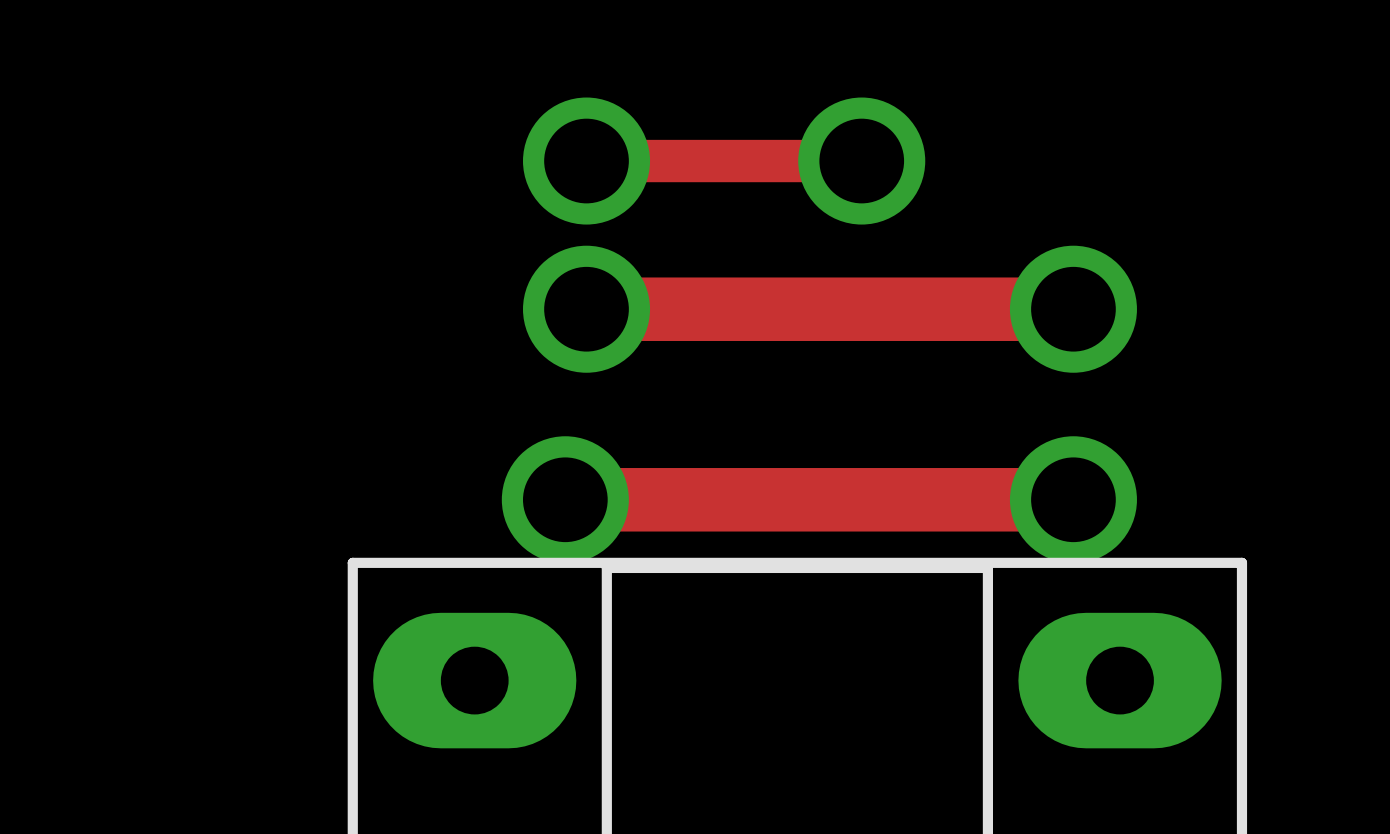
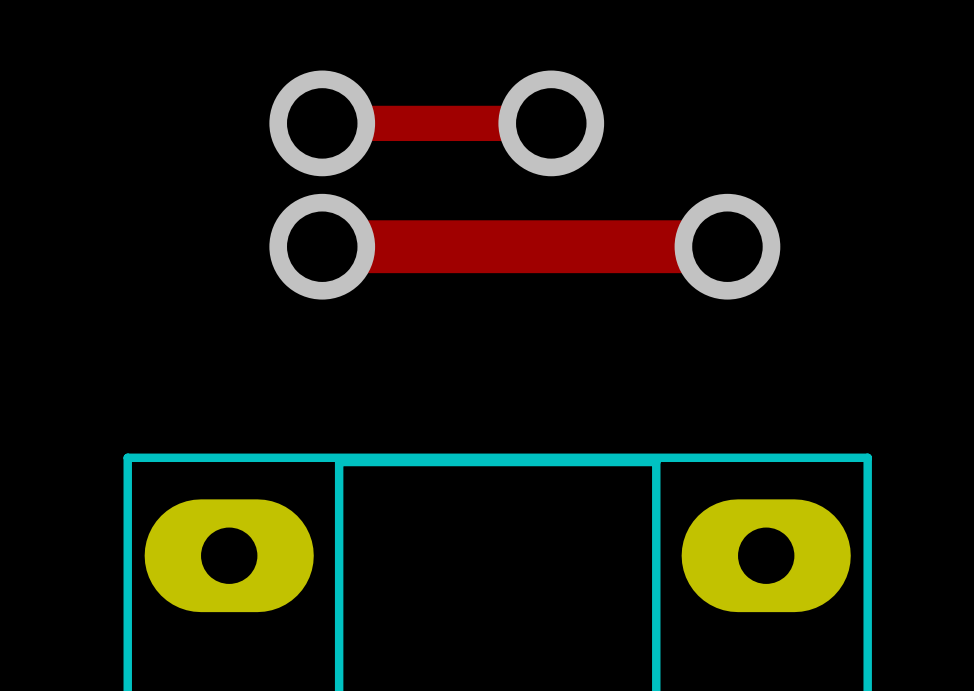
track: (565, 499) (1073, 499) -> none
via: (565, 499) -> none
via: (1073, 499) -> none

